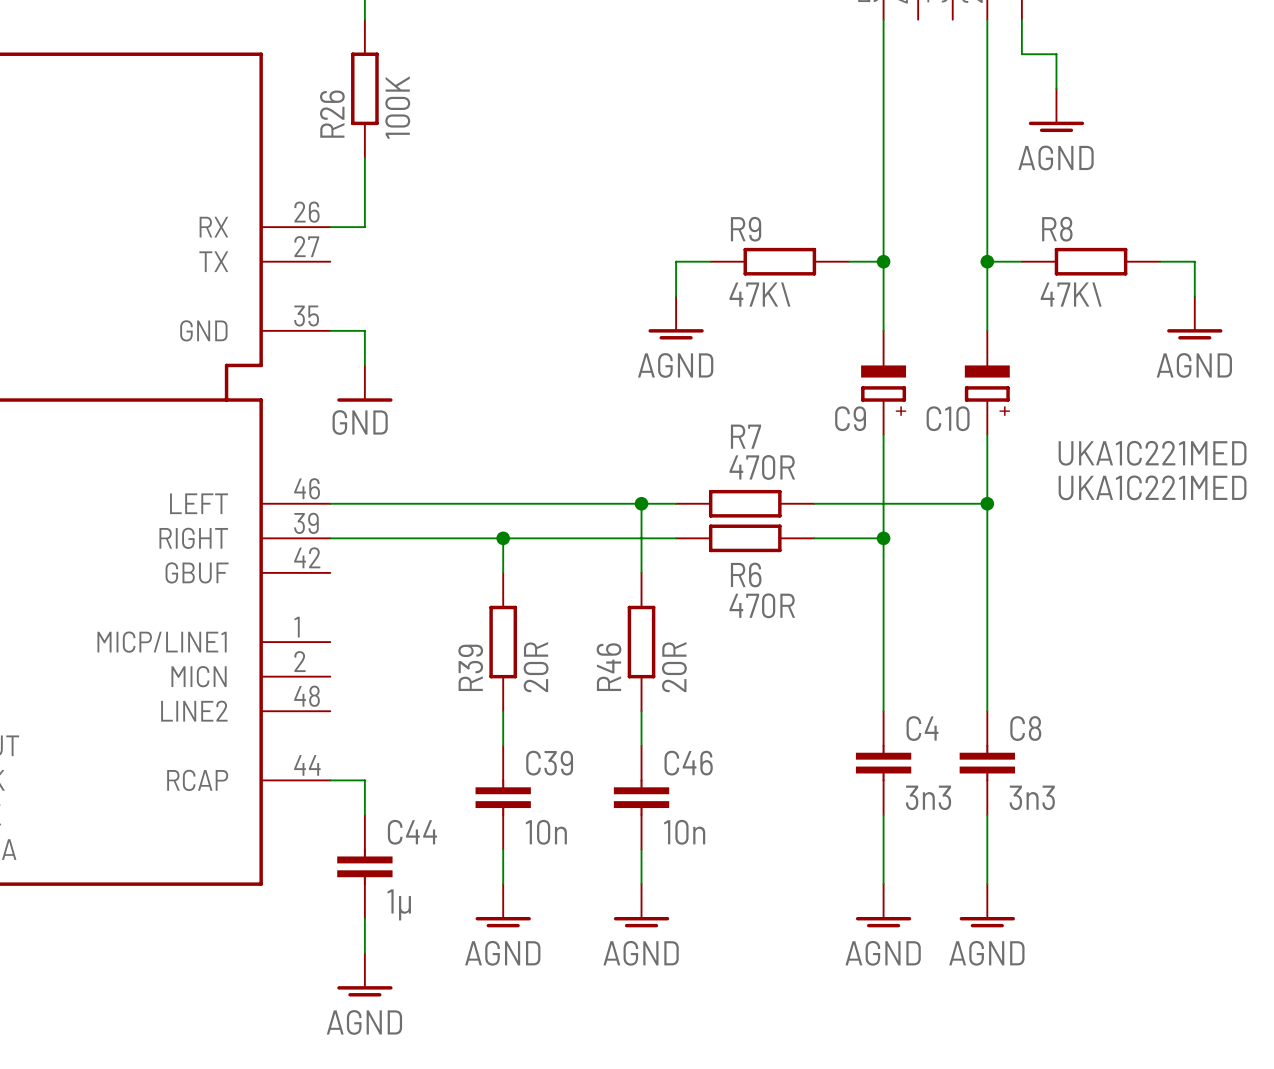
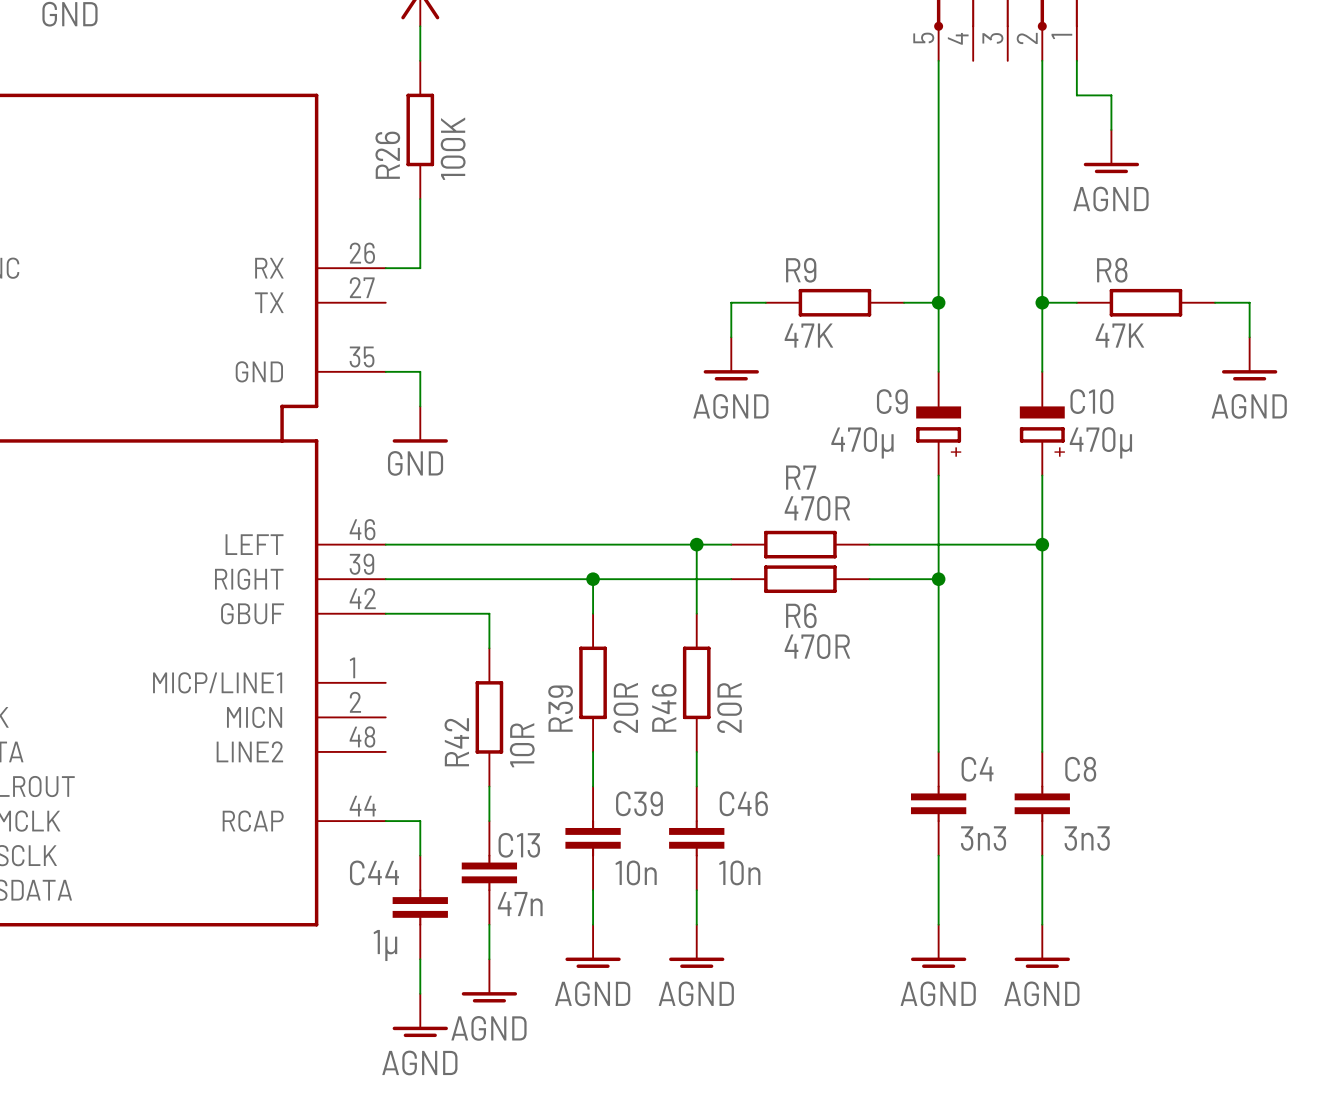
R9 value: 47K\ (759, 294) -> 47K (808, 335)
R8 value: 47K\ (1071, 294) -> 47K (1119, 335)
C9 name position: C9 (850, 418) -> C9 (892, 401)
C10 name position: C10 (948, 418) -> C10 (1091, 401)
C10 value: UKA1C221MED (1152, 453) -> 470μ (1100, 442)
C9 value: UKA1C221MED (1152, 487) -> 470μ (862, 442)
wire: (503, 538) (503, 572) -> (593, 579) (593, 613)
junction position: (503, 538) -> (593, 579)
wire: none -> (385, 613) (489, 613) (489, 648)
R39 position: (503, 642) -> (593, 682)
R42: none -> 10R (489, 717)
wire: (503, 711) (503, 745) -> (593, 751) (593, 786)
wire: none -> (489, 786) (489, 821)
C39 position: (503, 797) -> (593, 838)
C44 name position: C44 (412, 832) -> C44 (374, 872)
C13: none -> 47n (489, 872)
wire: (503, 849) (503, 884) -> (593, 890) (593, 924)
wire: none -> (489, 924) (489, 959)
C44 value position: 1μ (399, 904) -> 1μ (385, 945)
power symbol position: AGND (503, 905) -> AGND (593, 946)
power symbol: none -> AGND (489, 980)

